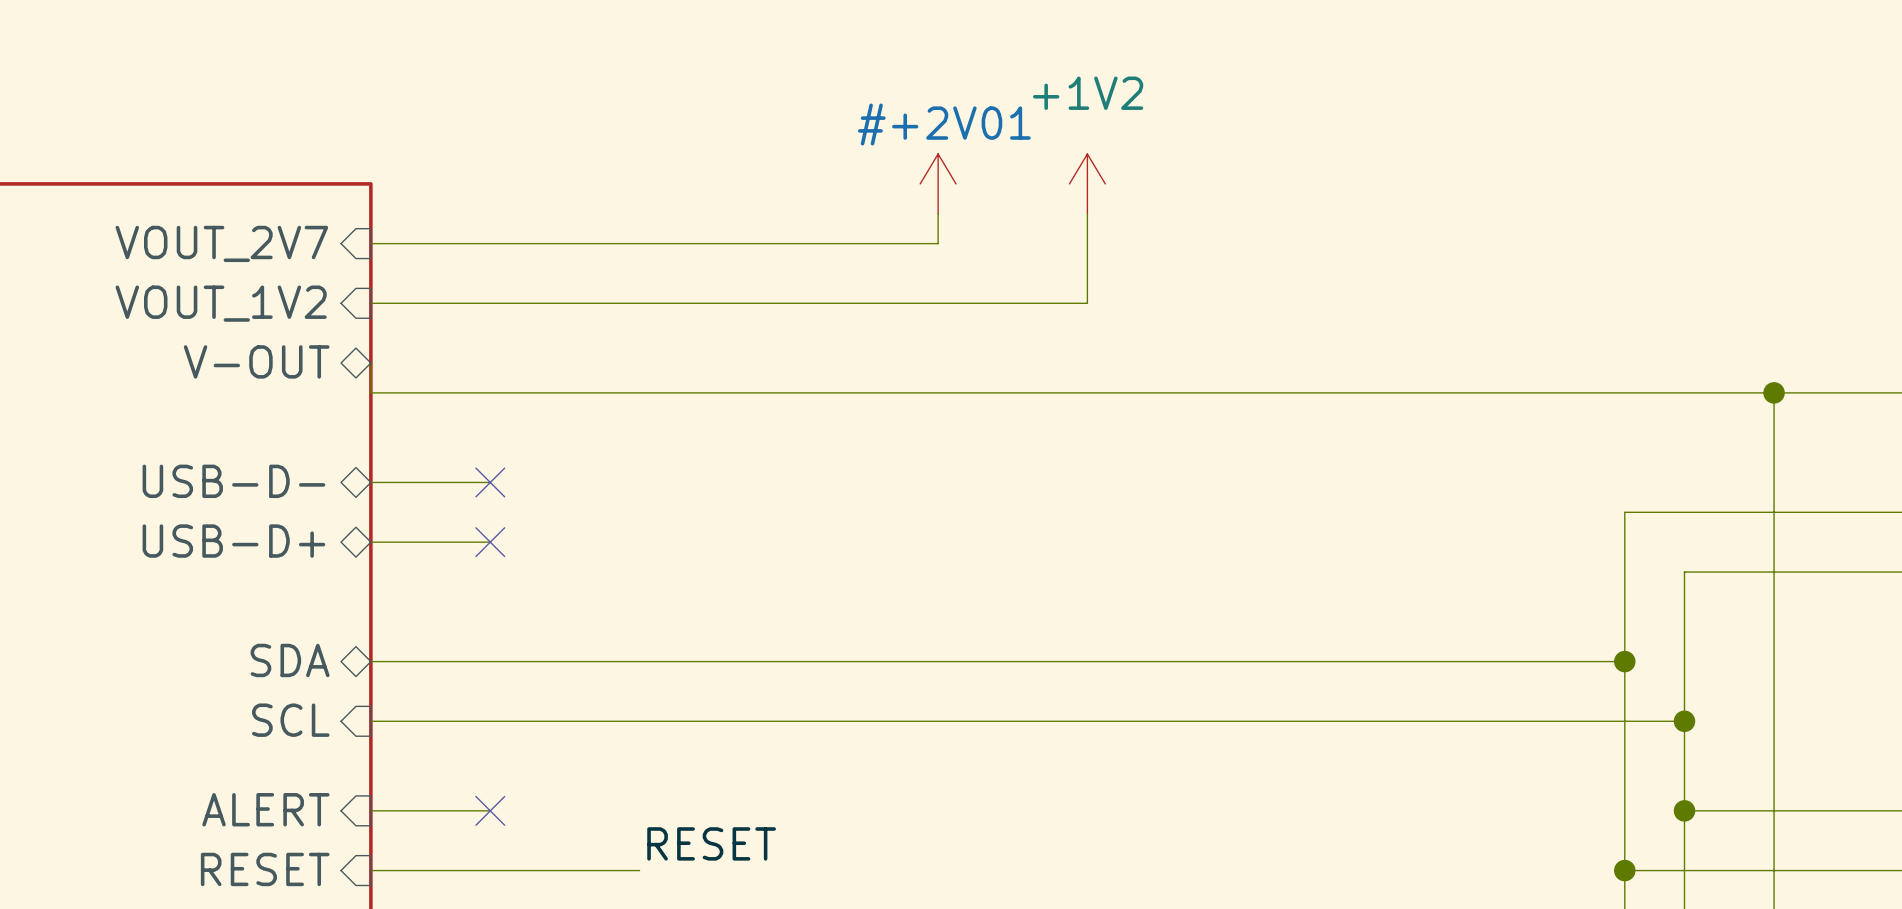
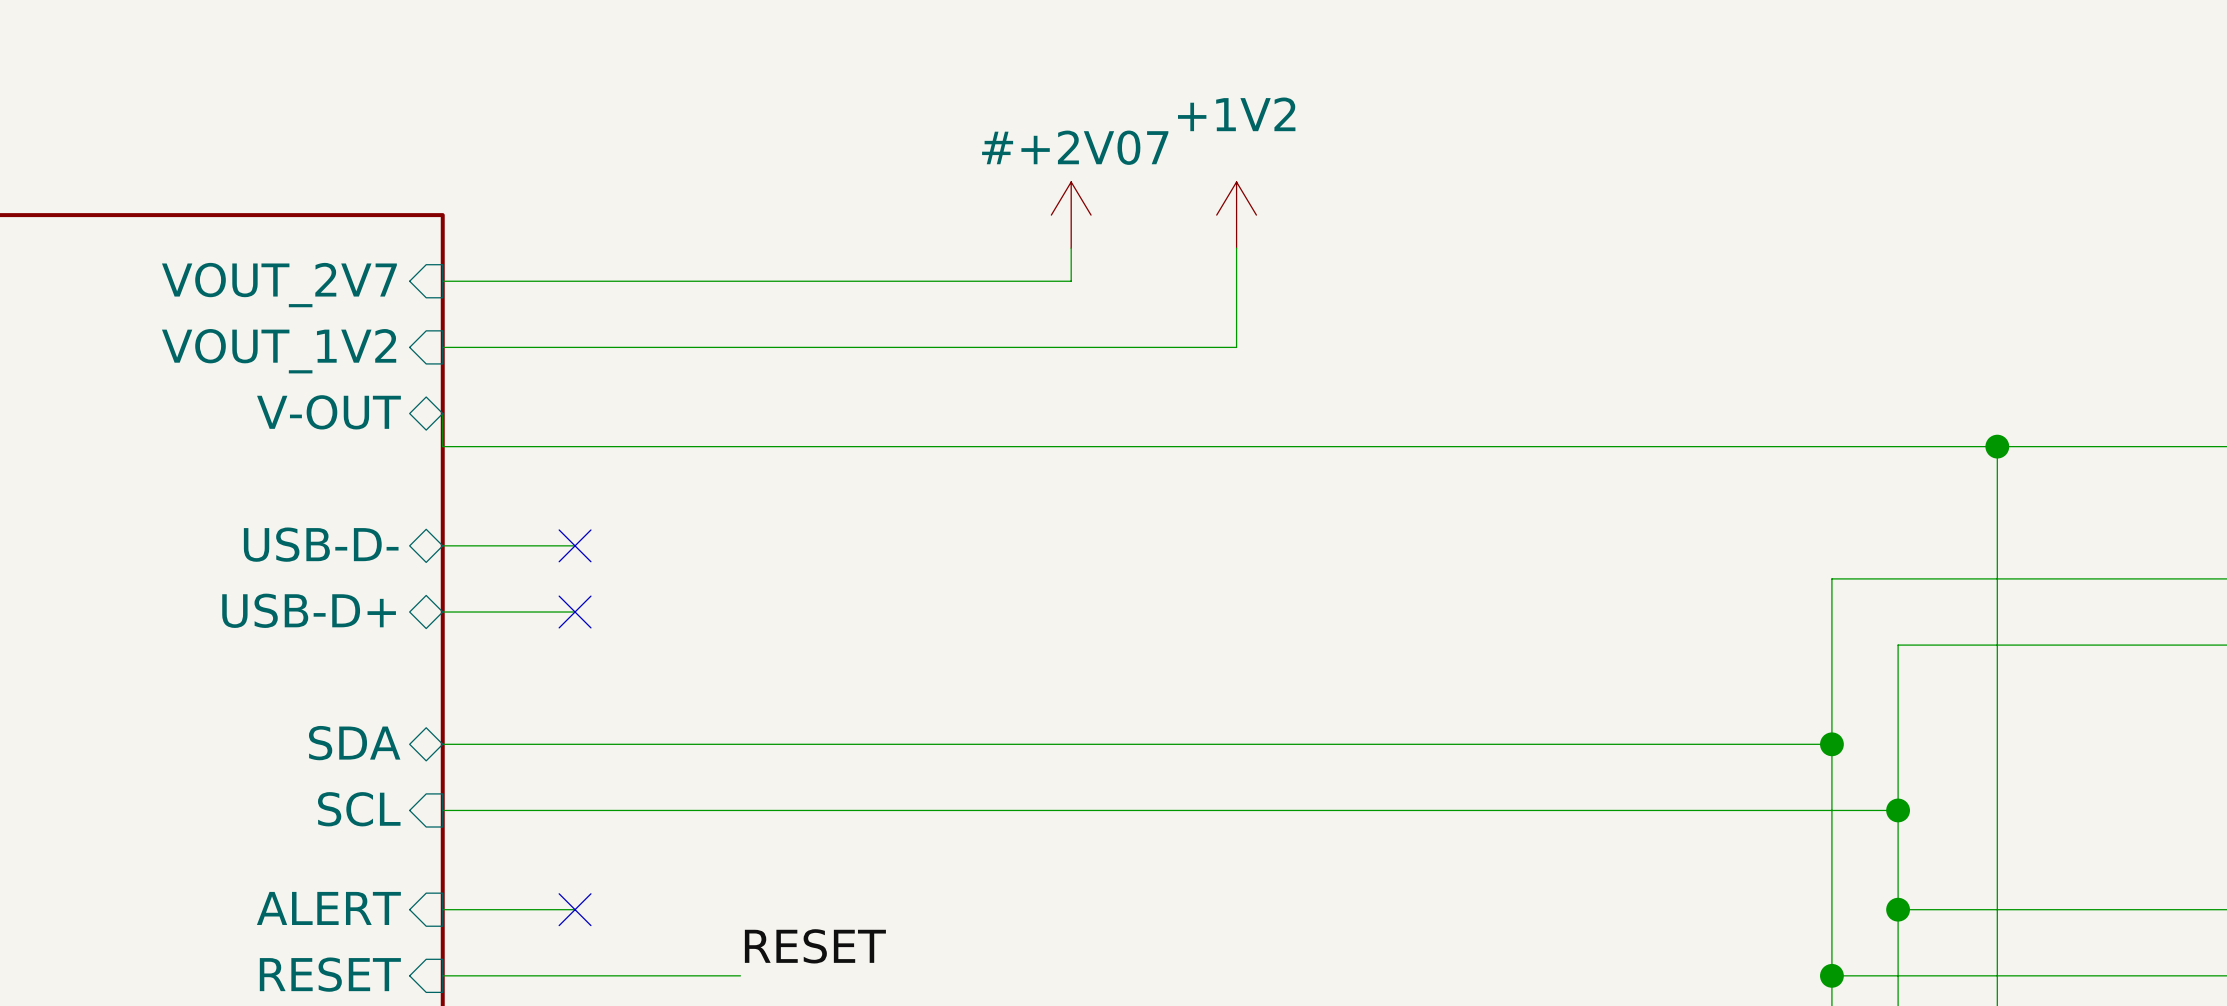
#+2V01 name: #+2V01 (944, 124) -> #+2V07 (1075, 147)

